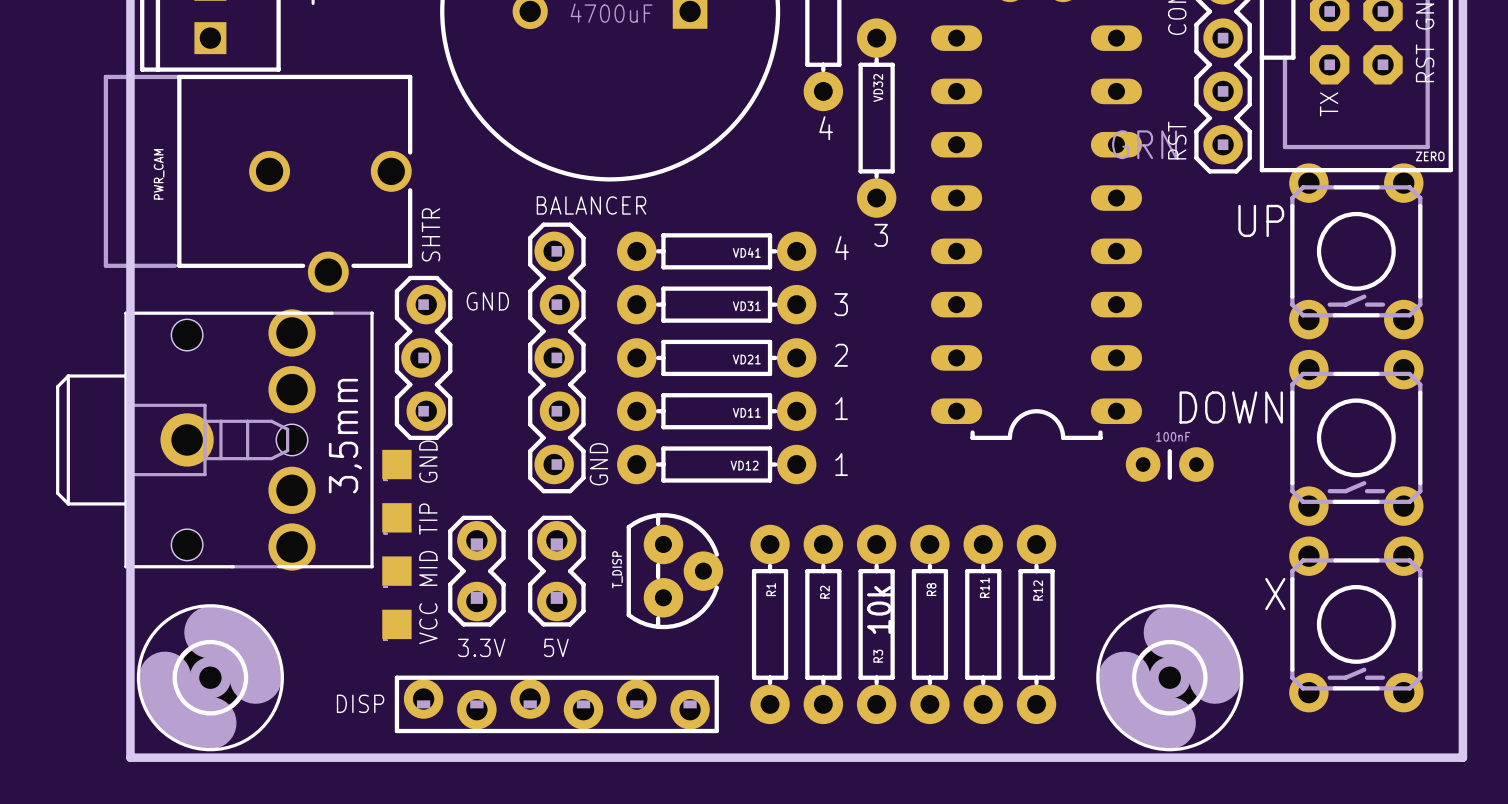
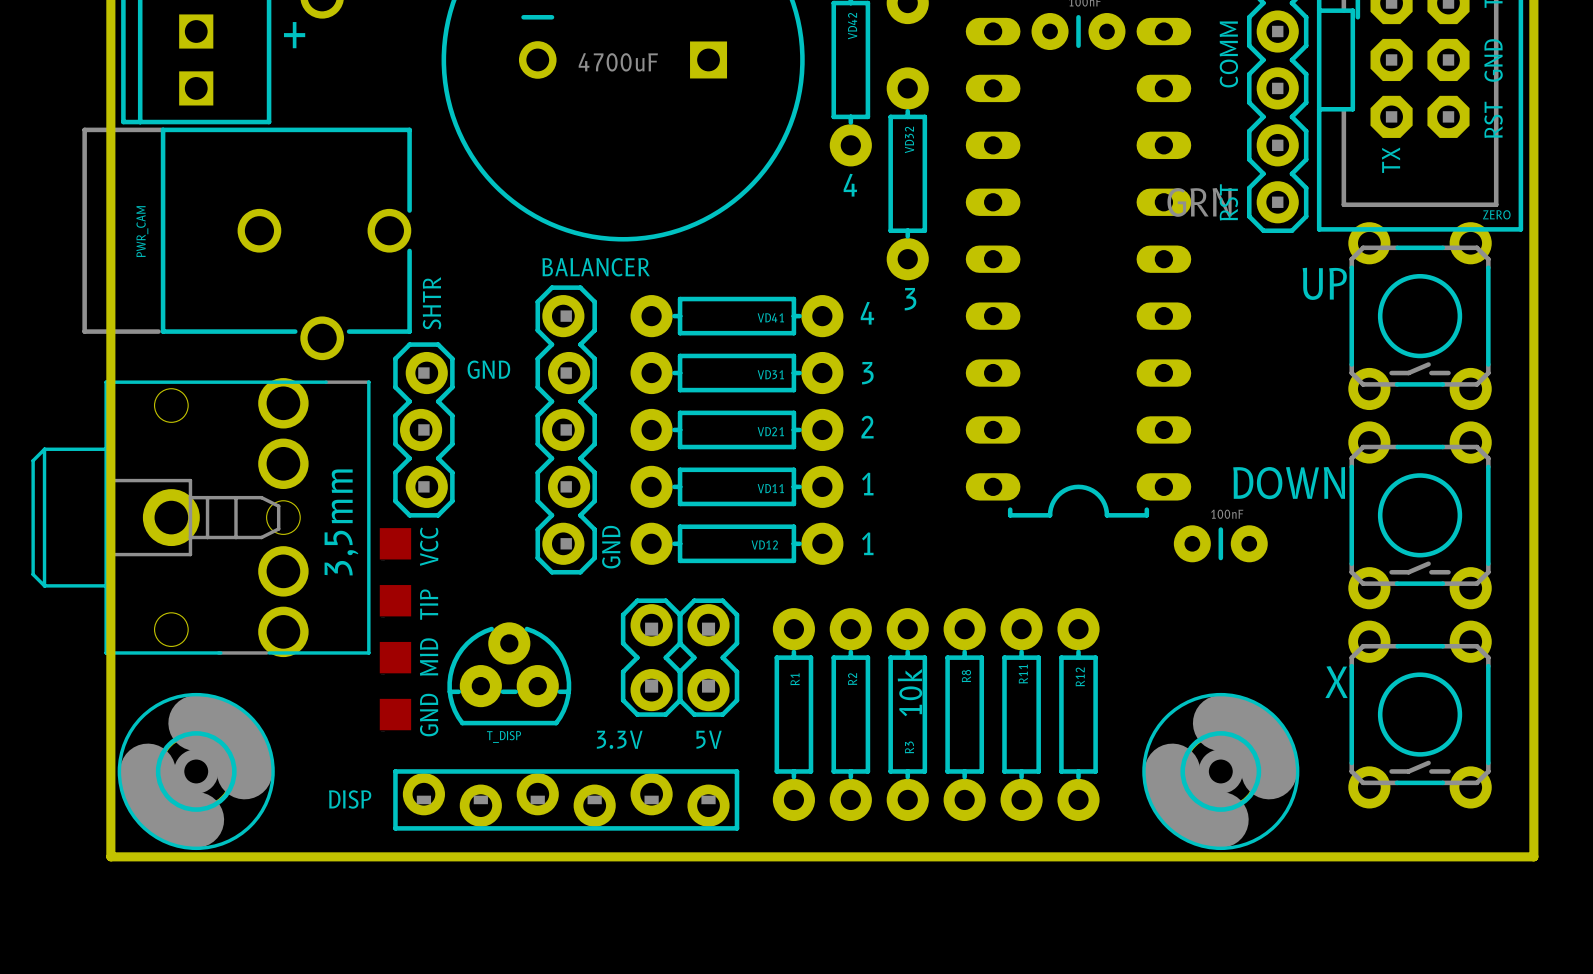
text: GND (428, 461) -> VCC (429, 546)
part: (476, 571) -> none
part: (556, 571) -> none
part: none -> (651, 657)
T_DISP rotation: 0° (674, 571) -> 90° counterclockwise (509, 673)
T_DISP position: (674, 571) -> (509, 673)
part: none -> (708, 657)
text: VCC (428, 623) -> GND (429, 715)
text position: 3.3V (481, 647) -> 3.3V (619, 739)
text position: 5V (556, 647) -> 5V (709, 739)

